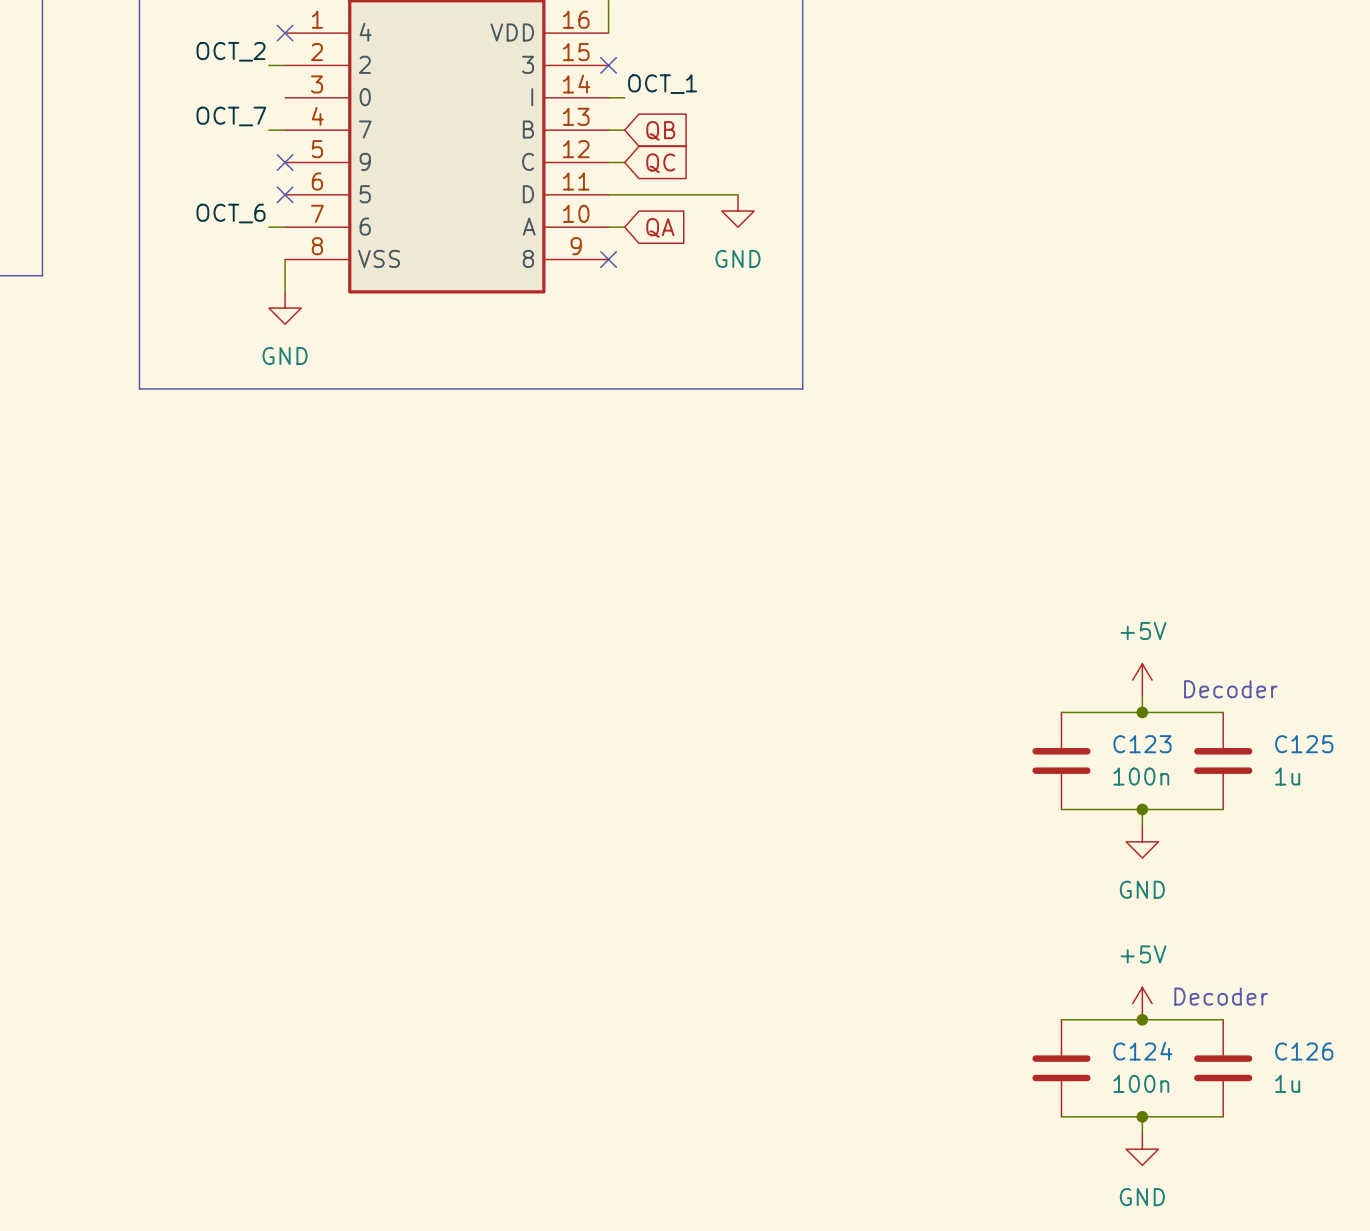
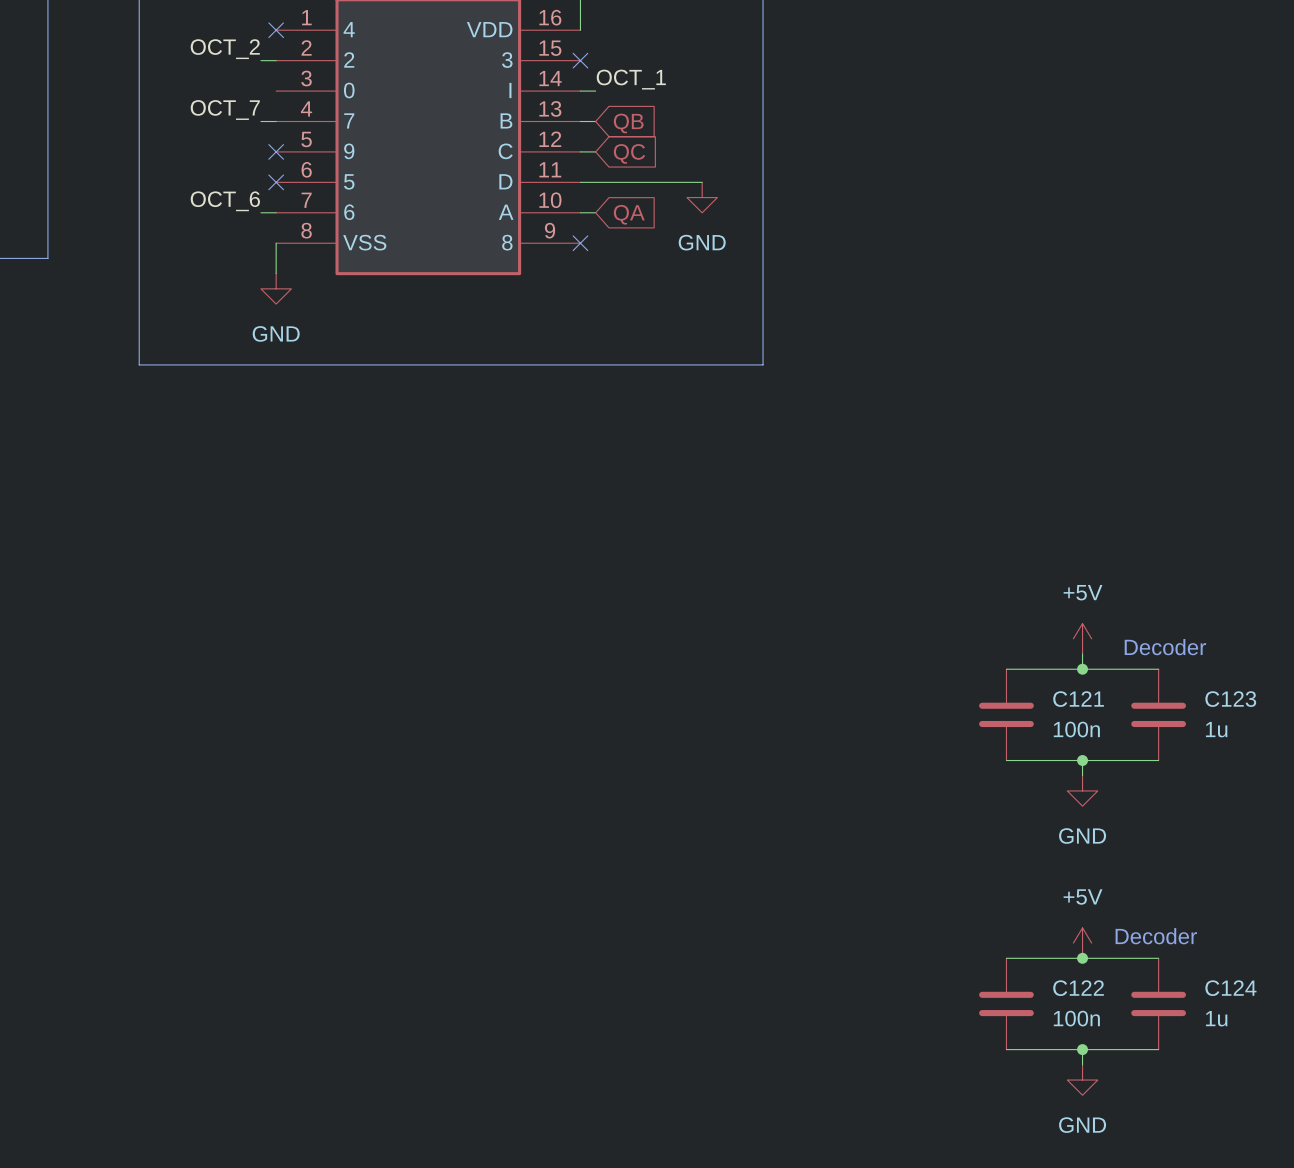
C123 name: C123 (1142, 744) -> C121 (1078, 699)
C125 name: C125 (1304, 744) -> C123 (1230, 699)
C124 name: C124 (1142, 1051) -> C122 (1078, 988)
C126 name: C126 (1304, 1051) -> C124 (1230, 988)

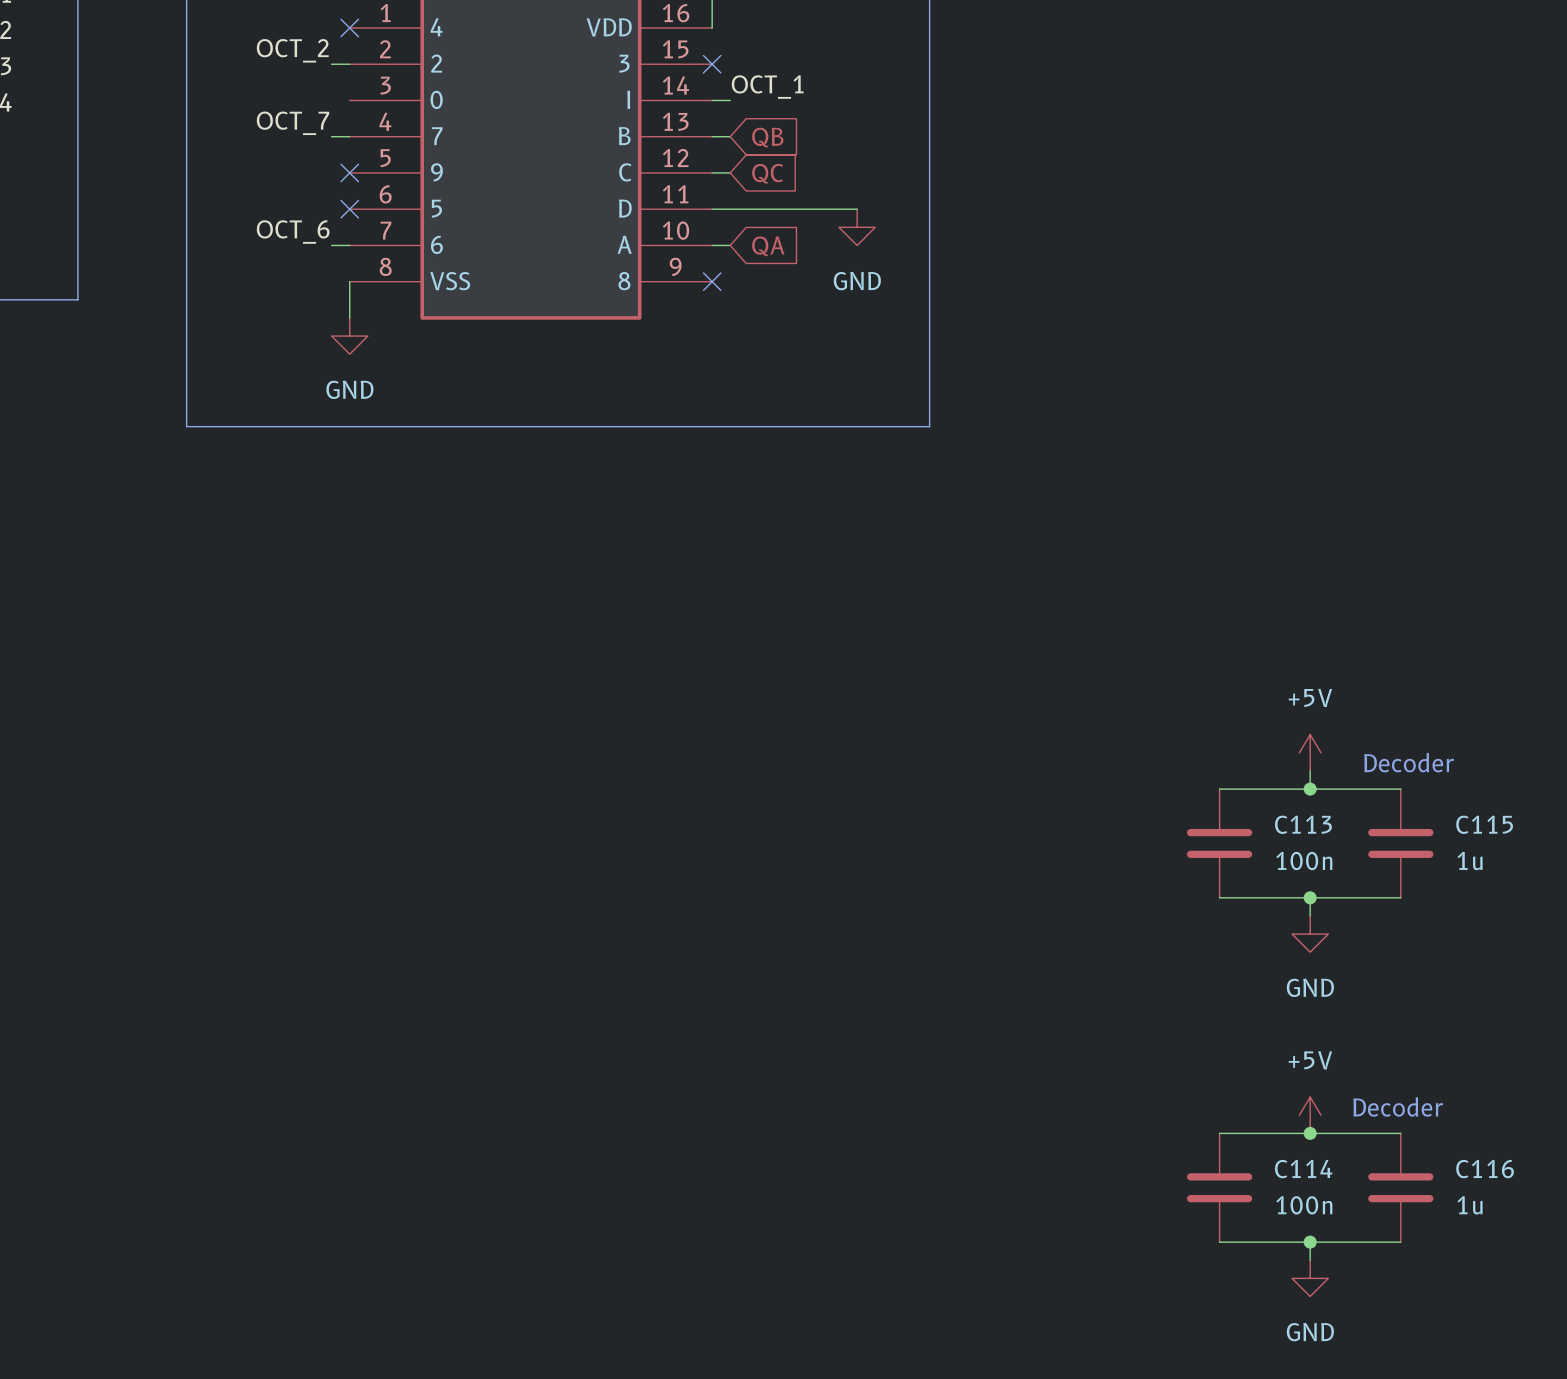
C121 name: C121 (1078, 699) -> C113 (1303, 824)
C123 name: C123 (1230, 699) -> C115 (1484, 824)
C122 name: C122 (1078, 988) -> C114 (1303, 1169)
C124 name: C124 (1230, 988) -> C116 (1485, 1169)

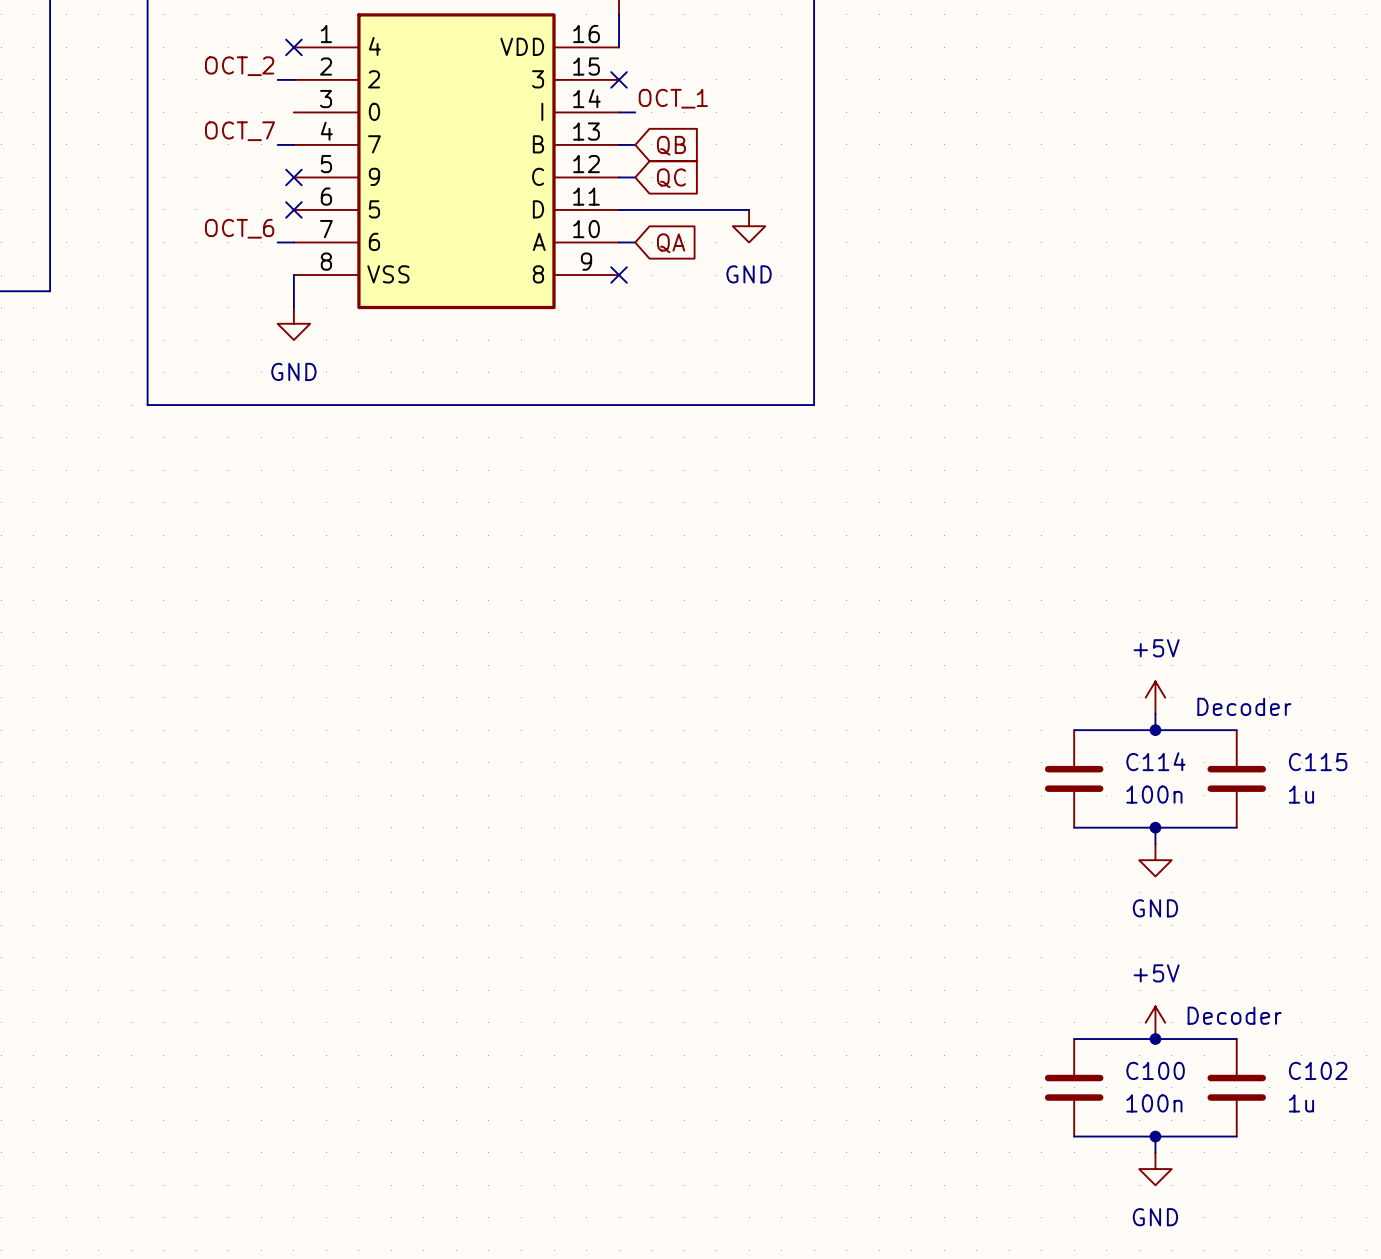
C113 name: C113 (1303, 824) -> C114 (1155, 761)
C114 name: C114 (1303, 1169) -> C100 (1155, 1070)
C116 name: C116 (1485, 1169) -> C102 (1318, 1070)

